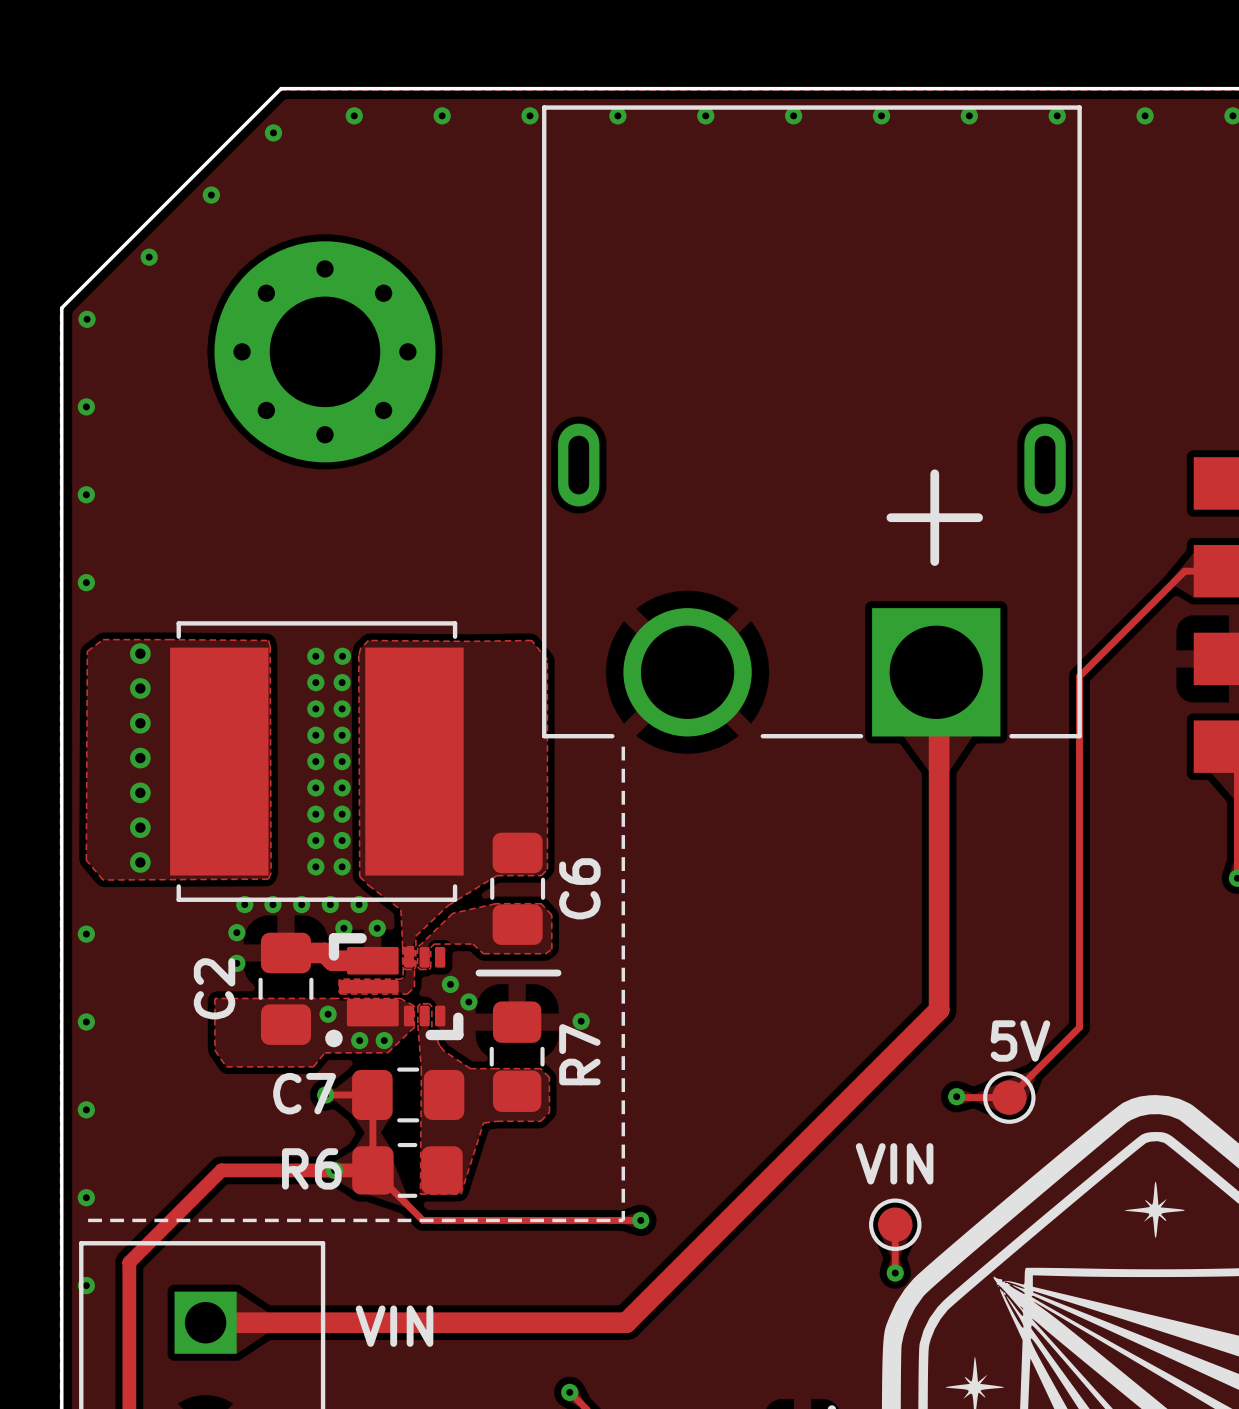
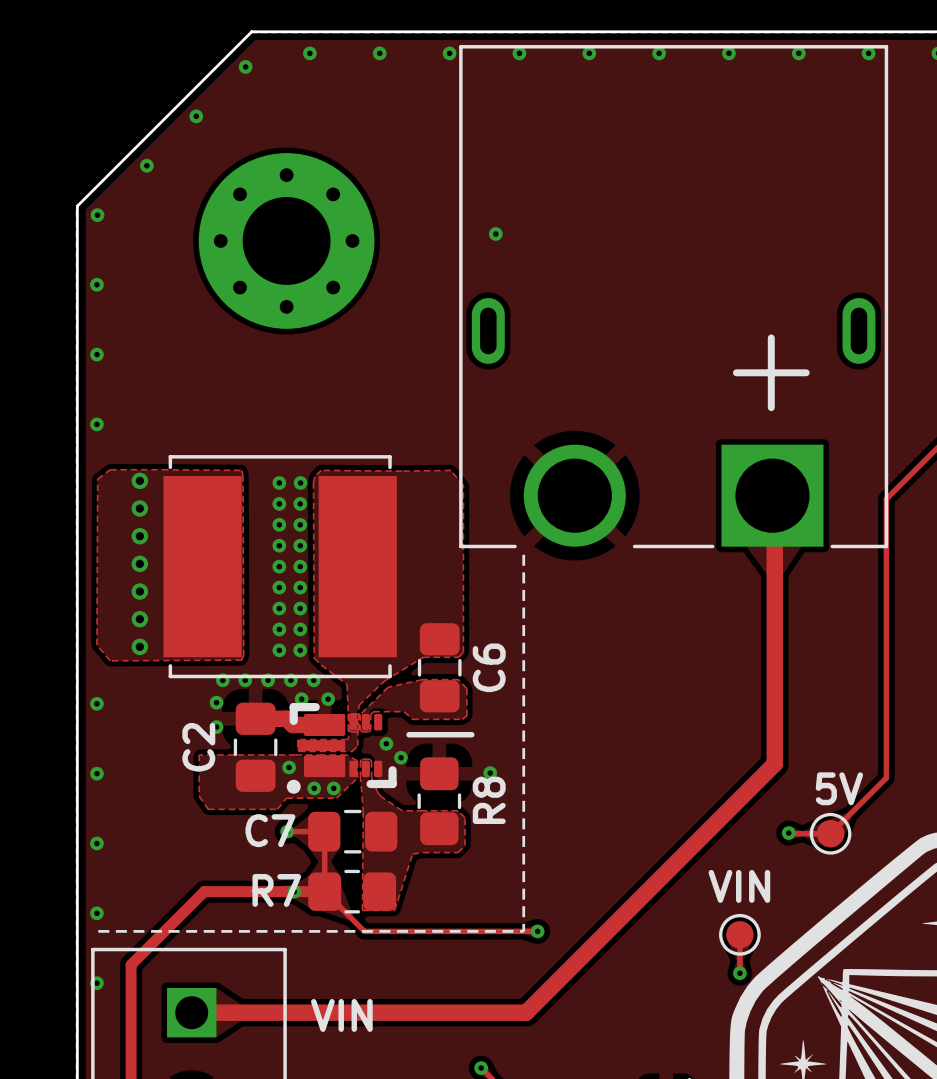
via: none -> (495, 234)
R7 name: R7 (579, 1054) -> R8 (489, 800)
R6 name: R6 (311, 1168) -> R7 (276, 890)

